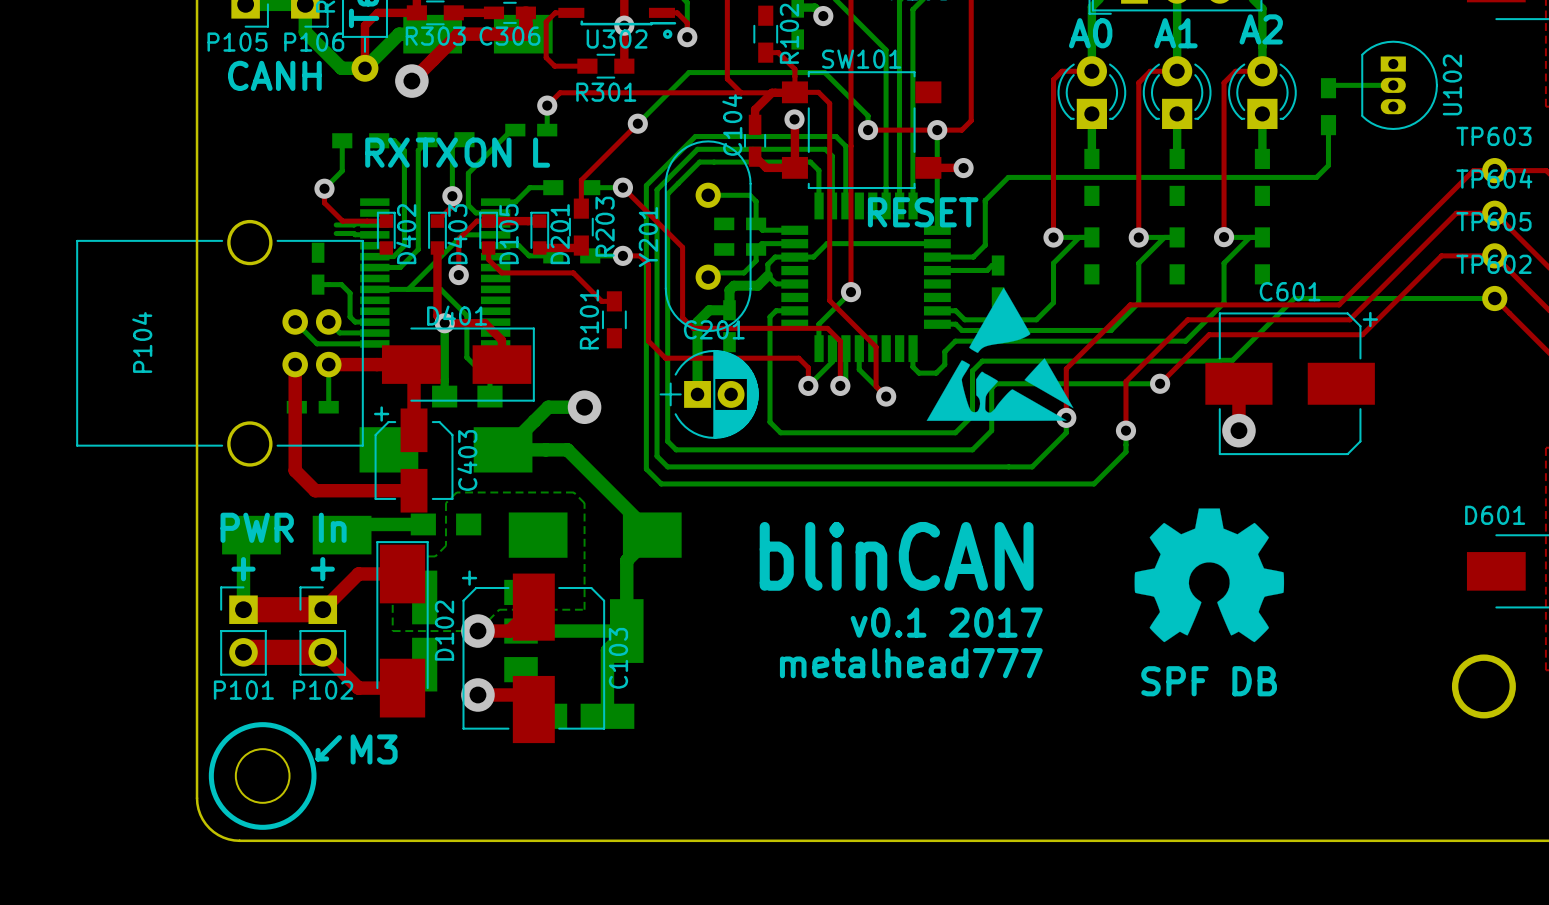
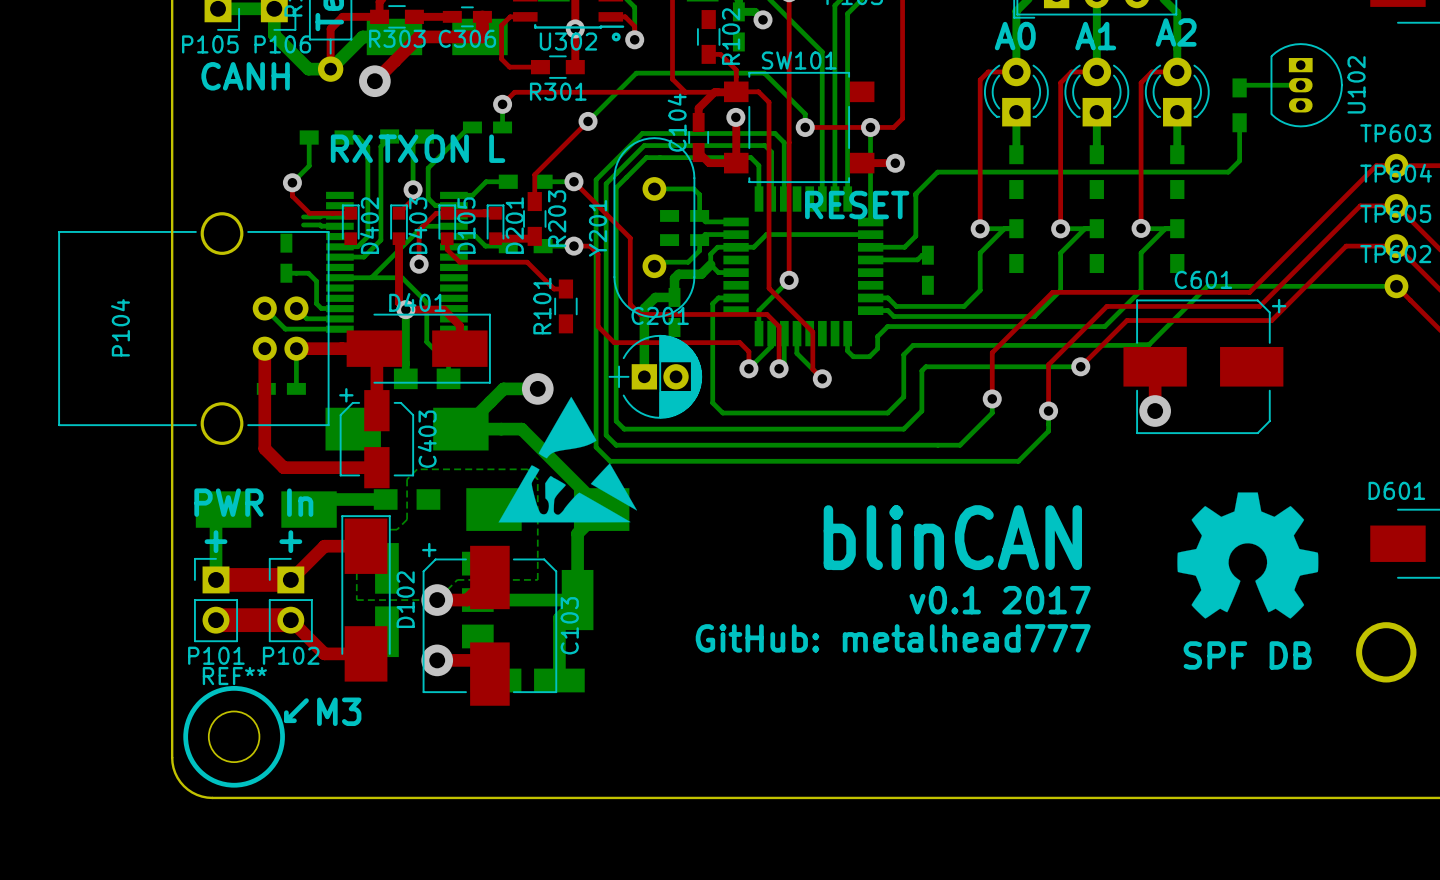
drawing position: (1000, 354) -> (567, 459)
text position: blinCAN (896, 556) -> blinCAN (952, 537)
drawing position: (1209, 575) -> (1247, 555)
text position: v0.1 2017 (946, 622) -> v0.1 2017 (1000, 600)
text: metalhead777 (911, 663) -> GitHub: metalhead777 (893, 638)
text position: SPF DB (1209, 681) -> SPF DB (1247, 655)
REF** name: none -> REF** (234, 676)

